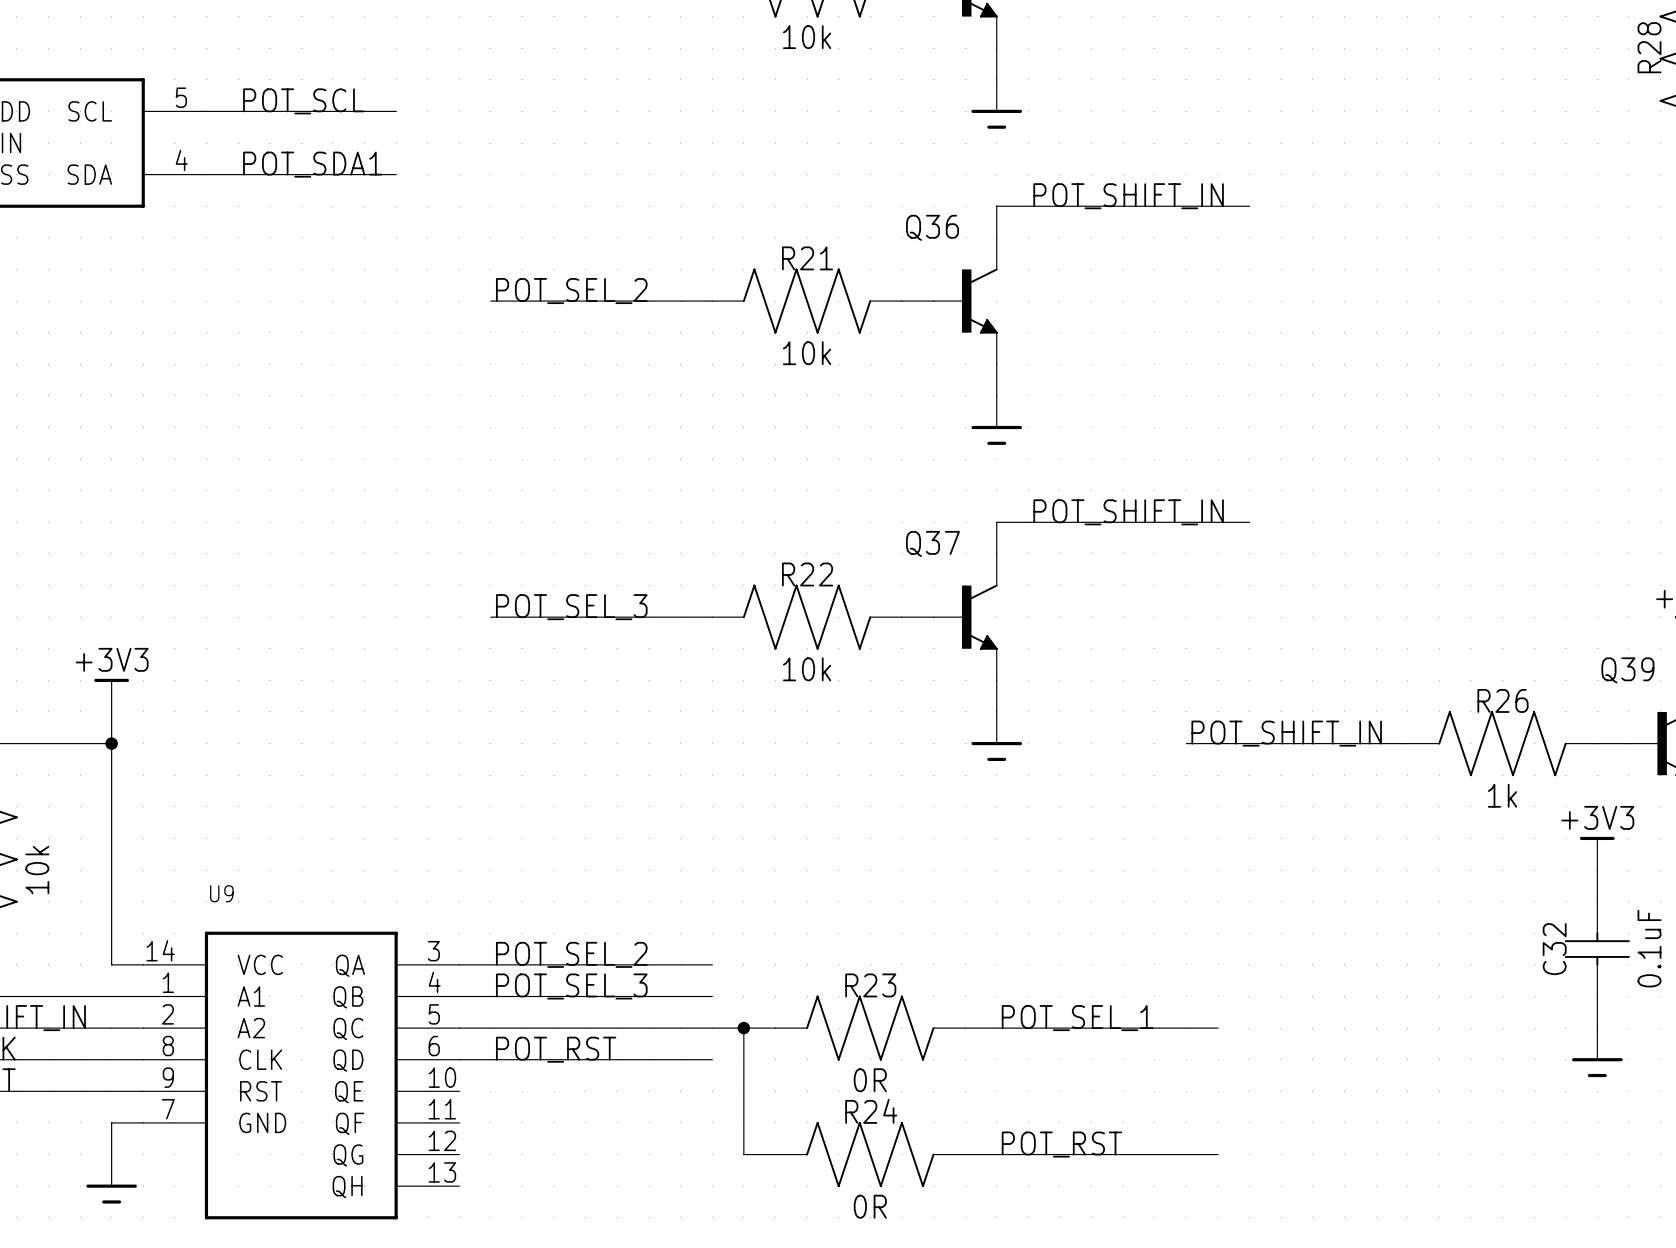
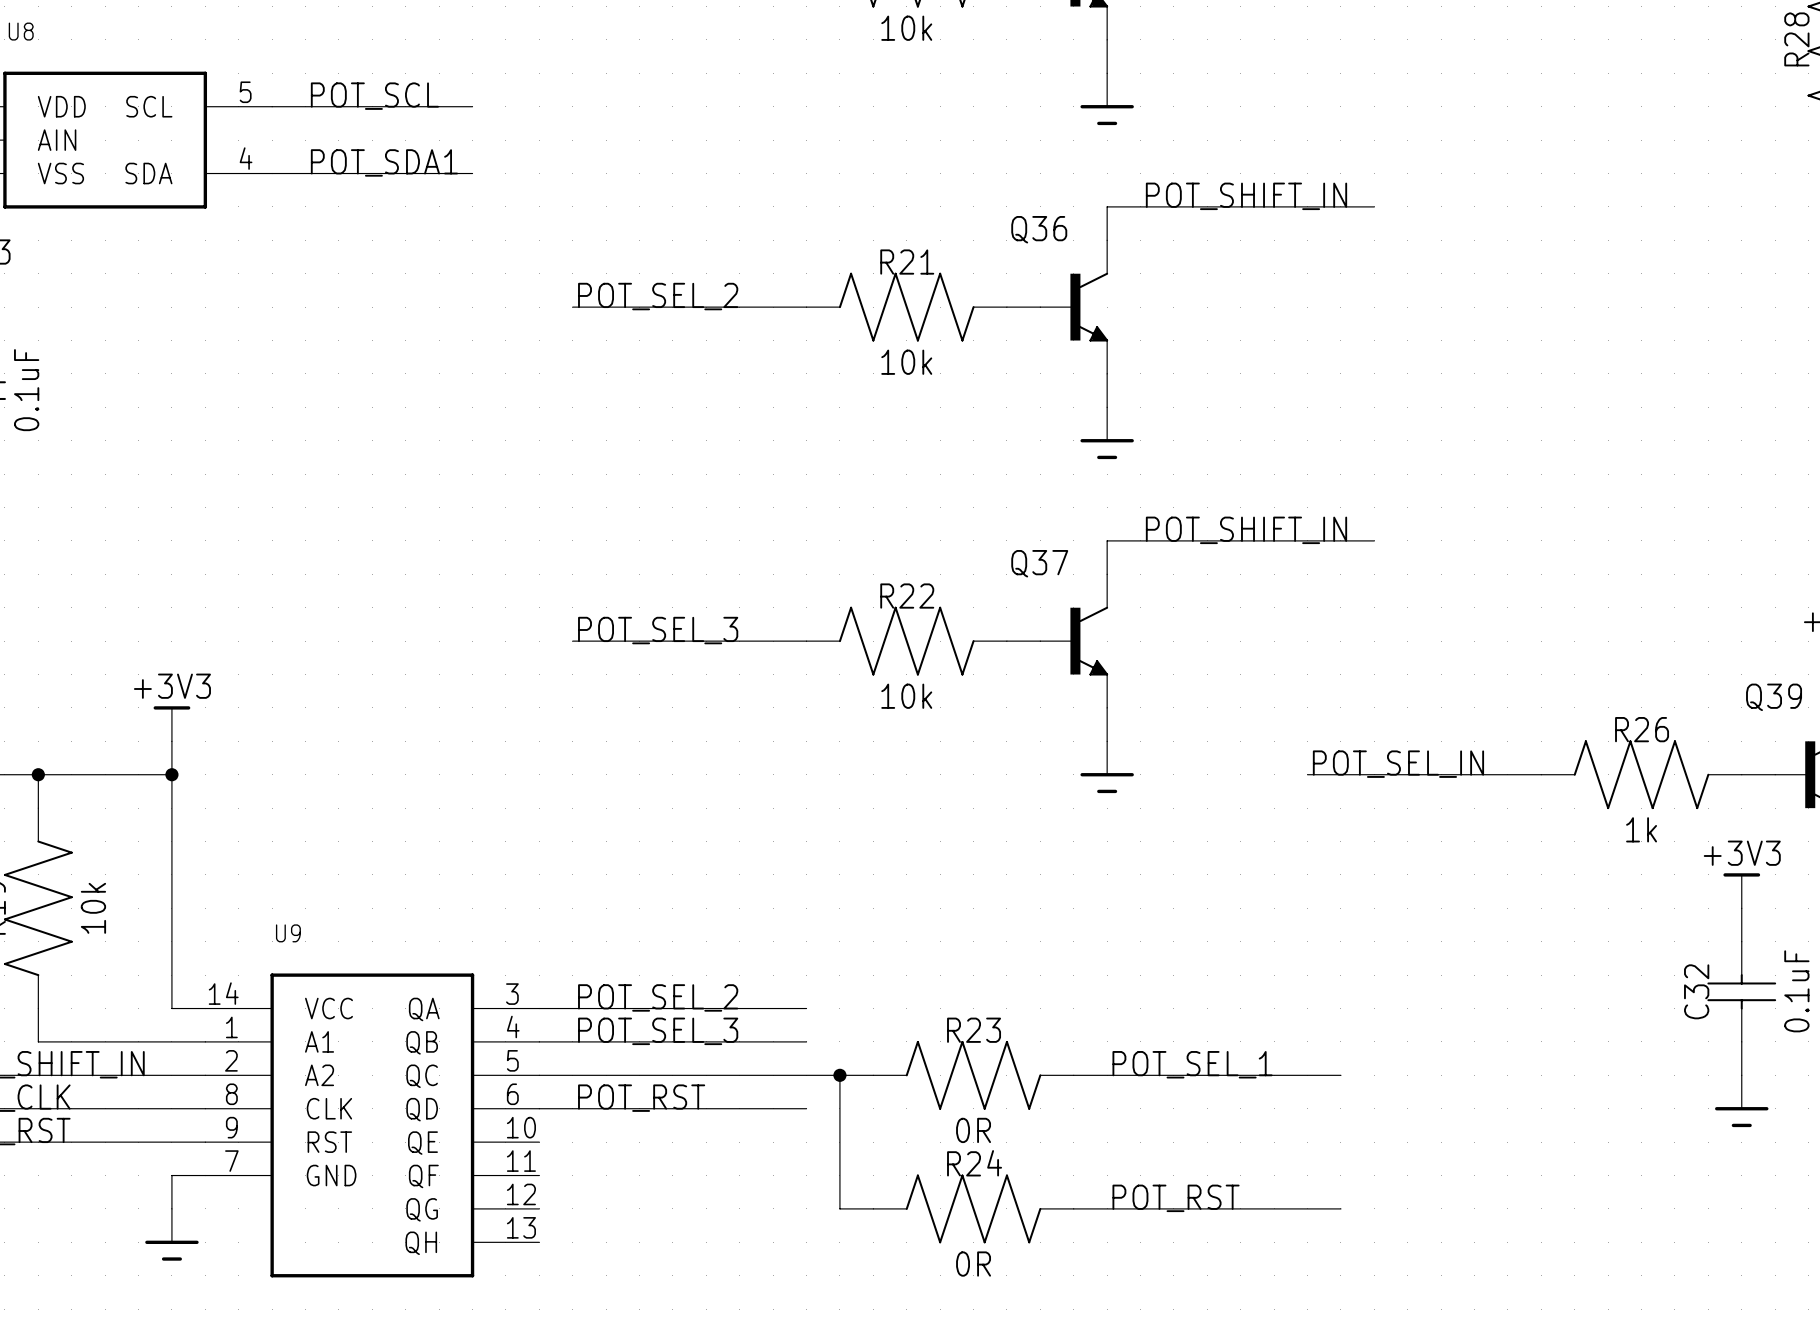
label: POT_SHIFT_IN (1286, 733) -> POT_SEL_IN (1398, 764)

